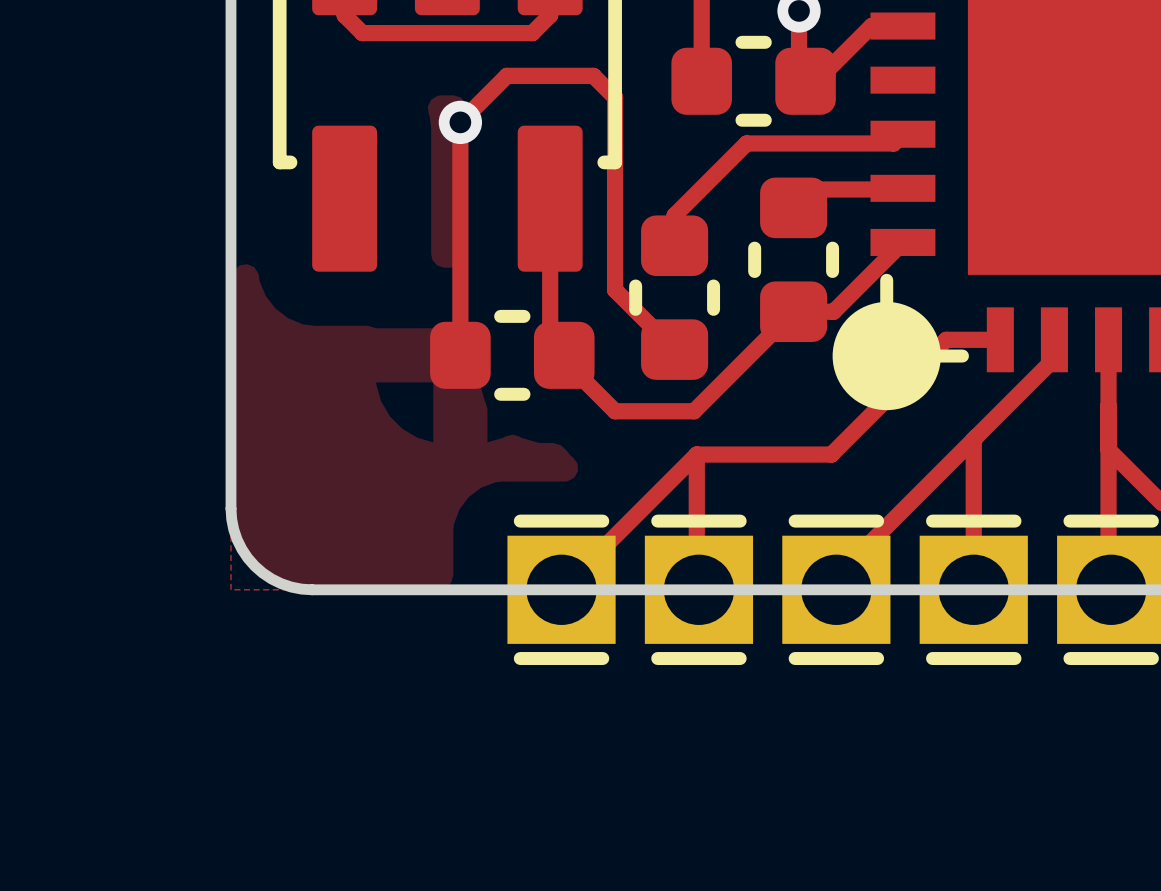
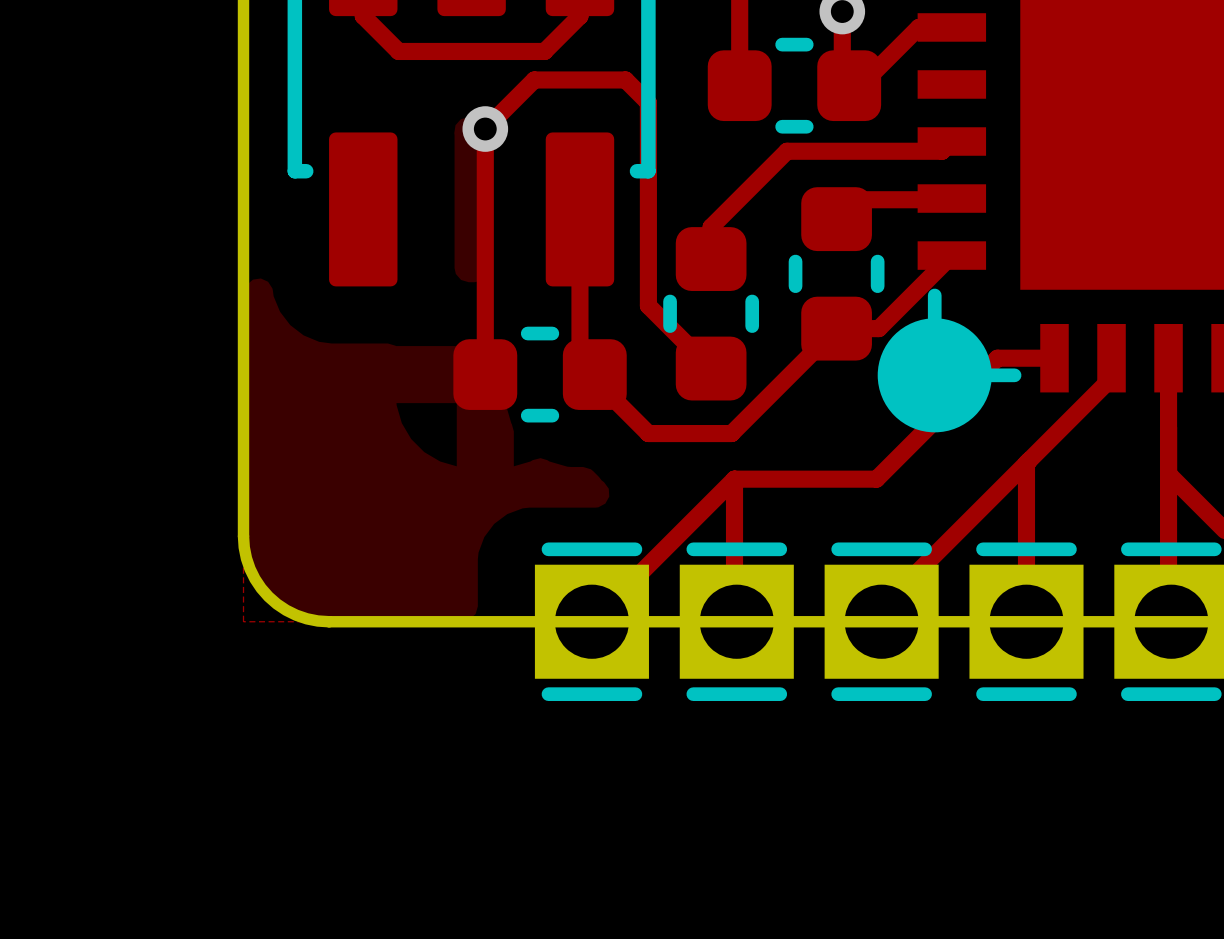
track: (362, 33) (532, 33) -> (382, 34) (398, 51) (544, 51) (561, 34)

